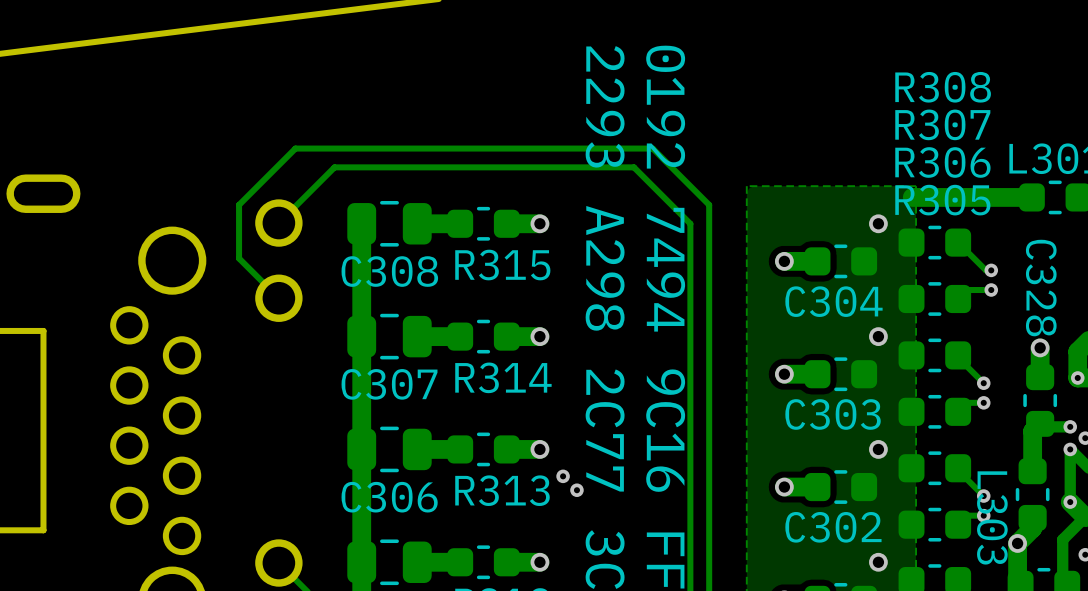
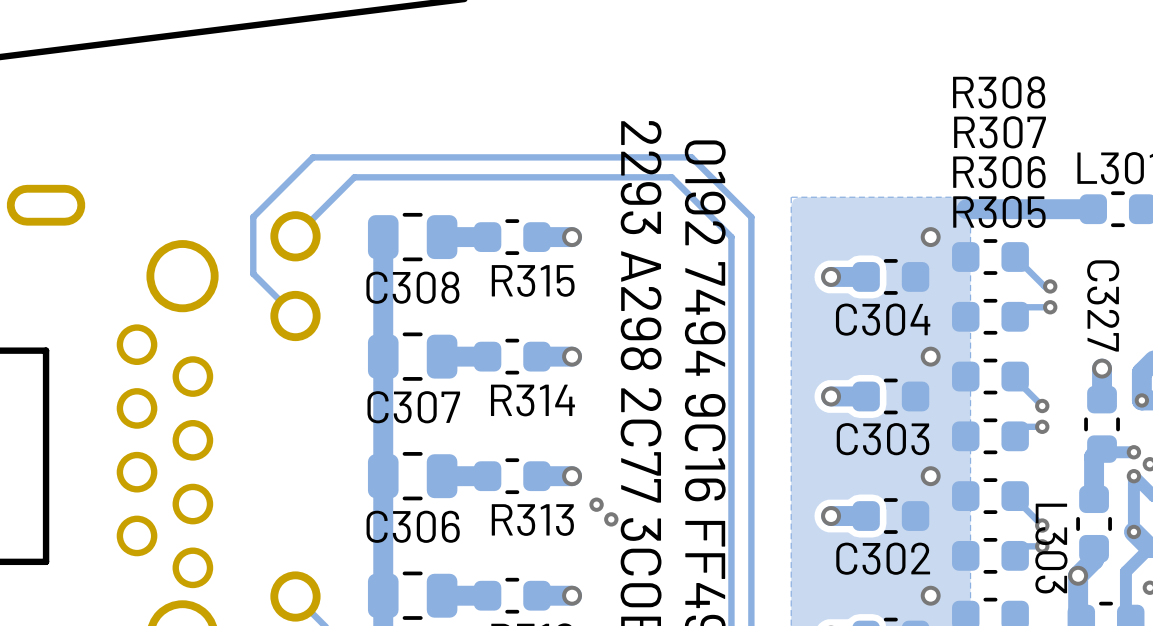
C328 name: C328 (1041, 288) -> C327 (1103, 305)

